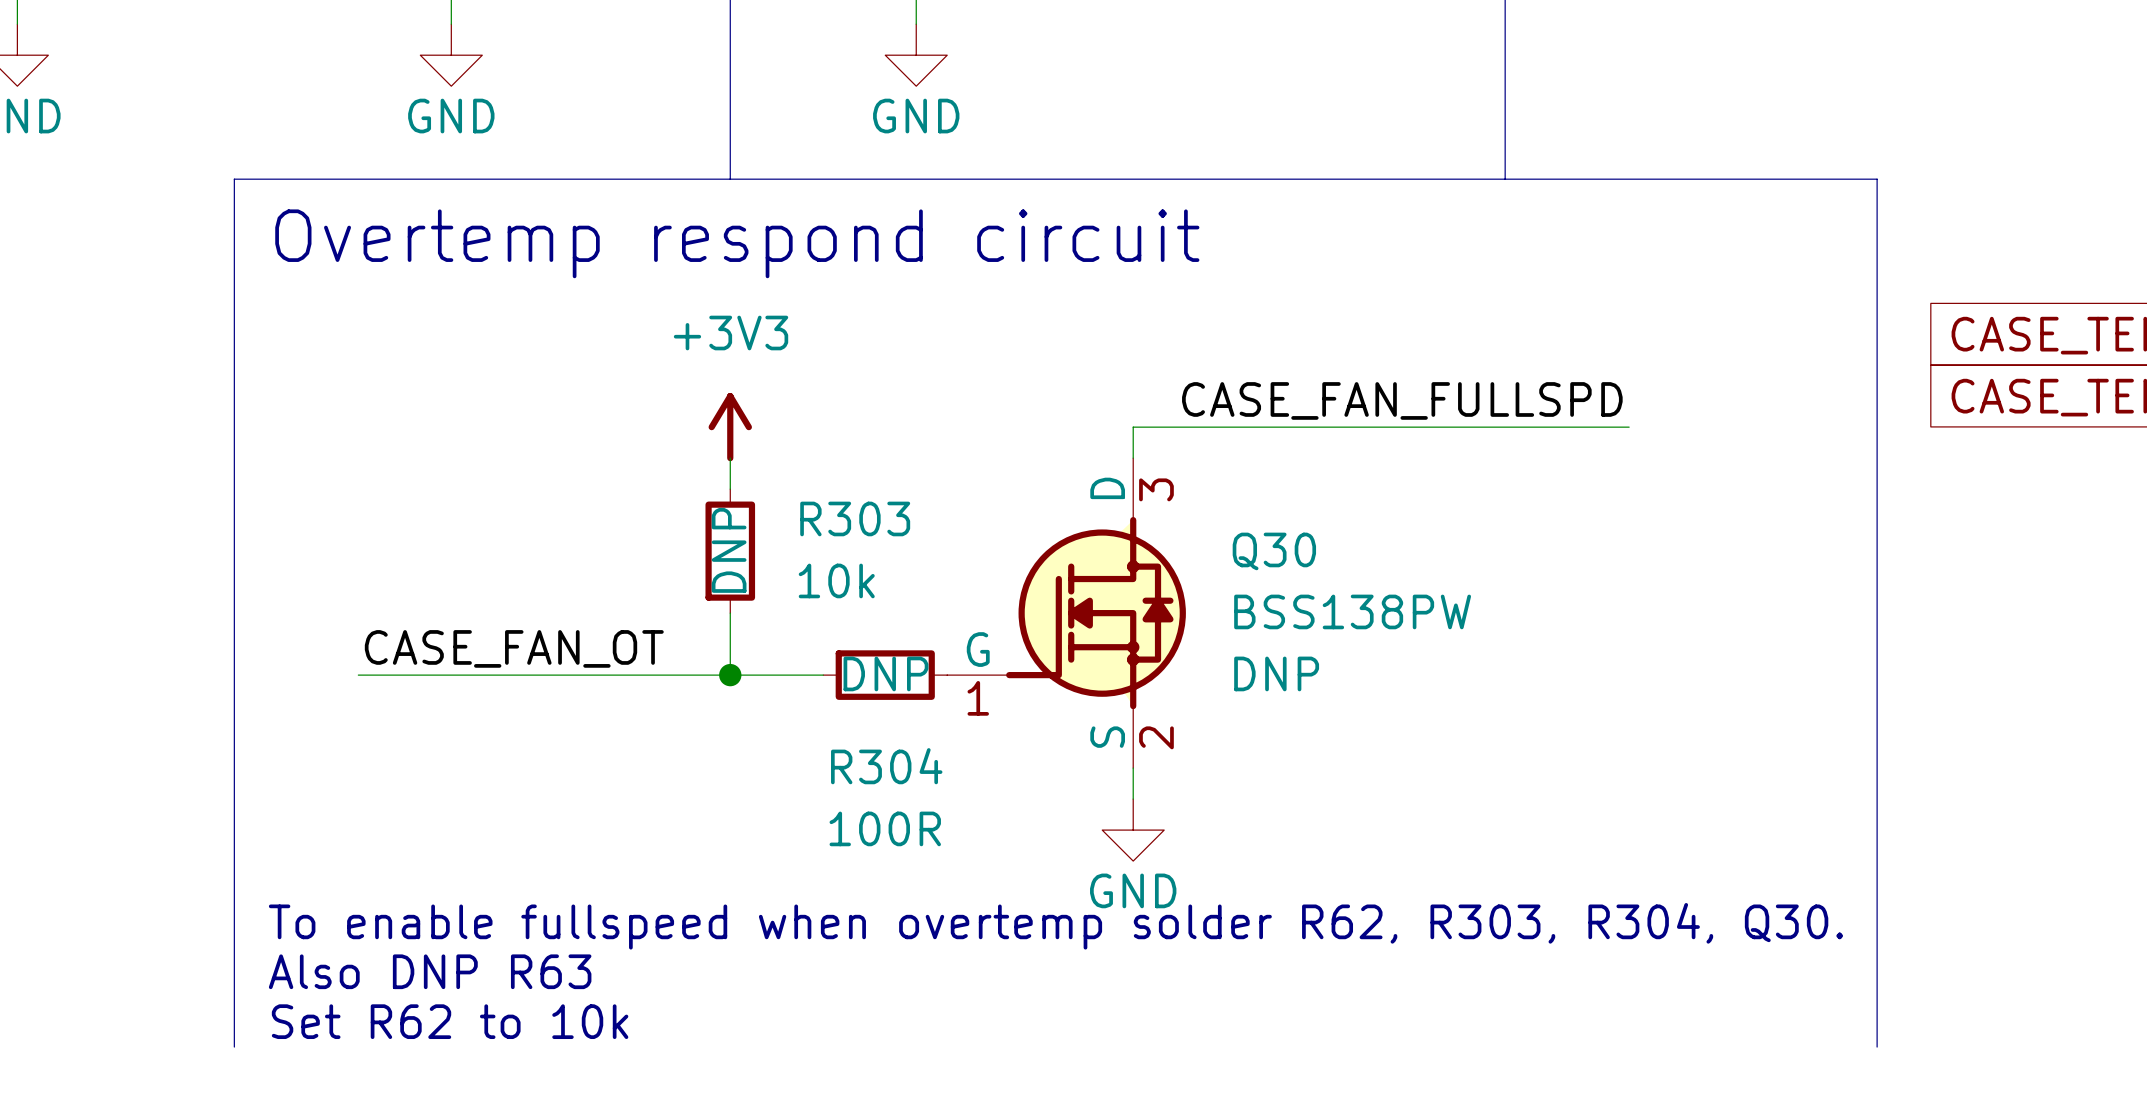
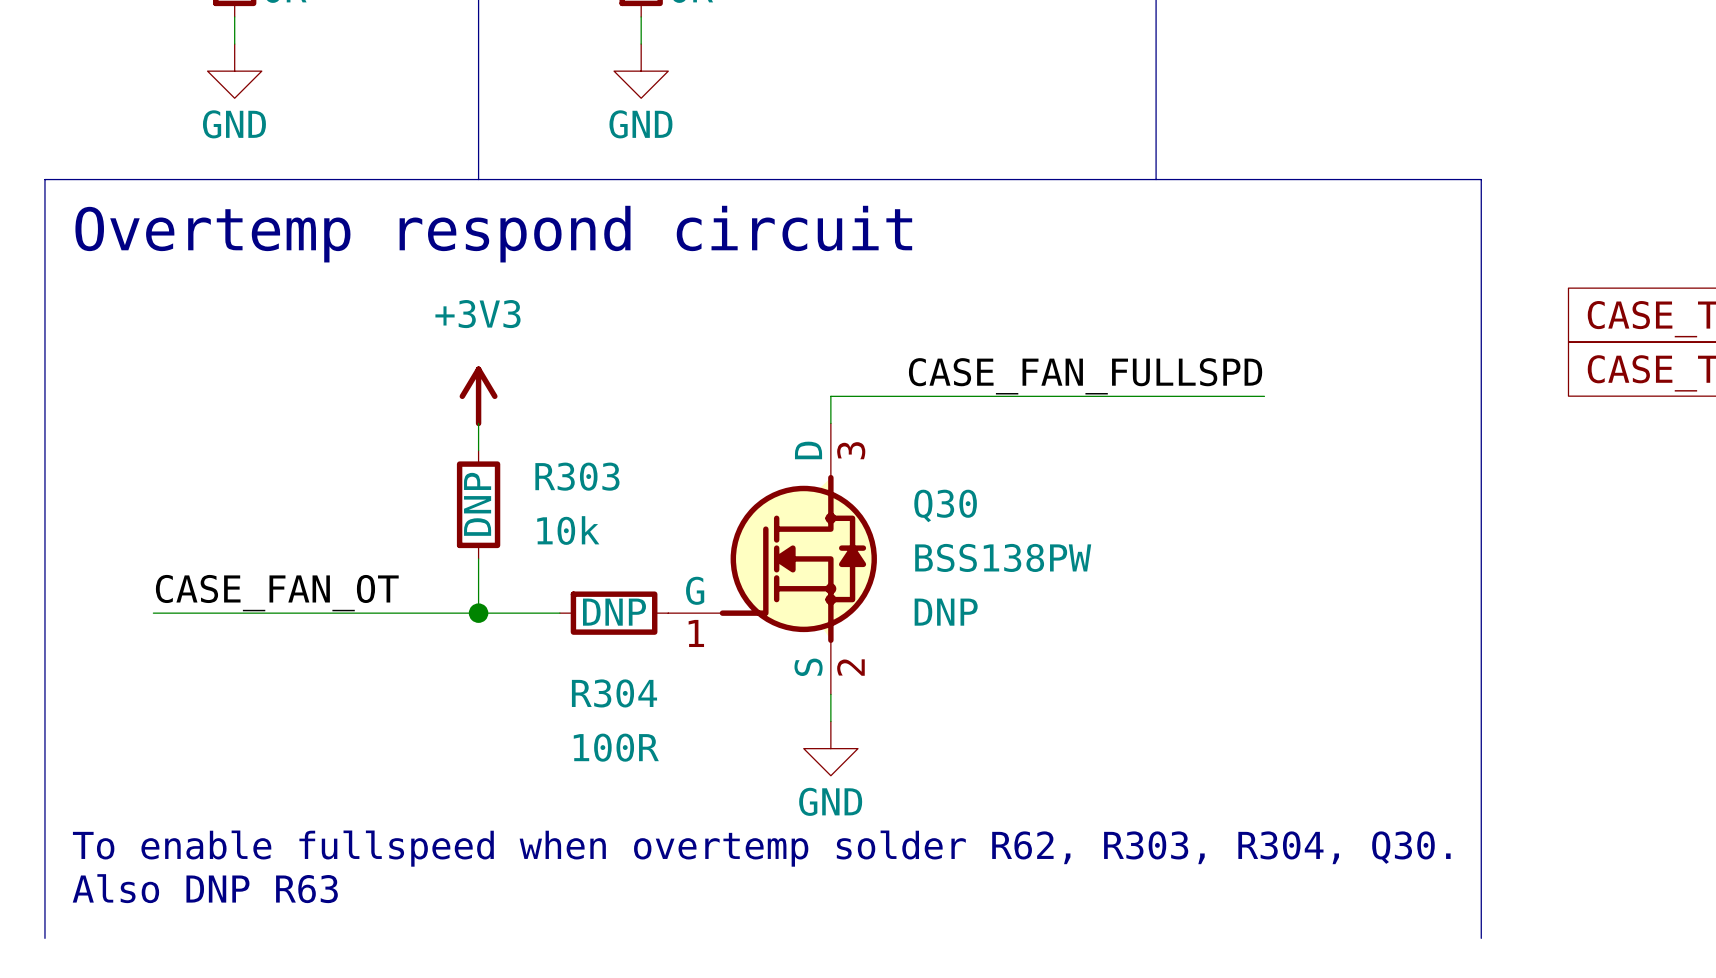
text position: To enable fullspeed when overtemp solder R62, R303, R304, Q30. (1055, 926) -> To enable fullspeed when overtemp solder R62, R303, R304, Q30. (761, 848)
text position: Also DNP R63 (430, 971) -> Also DNP R63 (205, 888)
text: Set R62 to 10k (450, 1021) -> none

